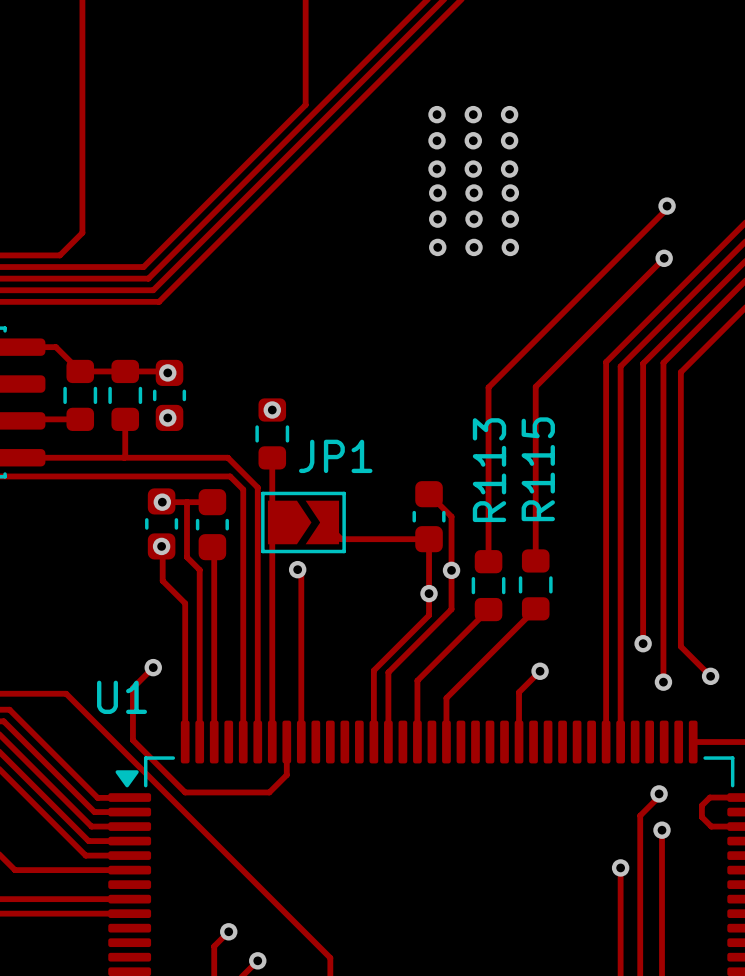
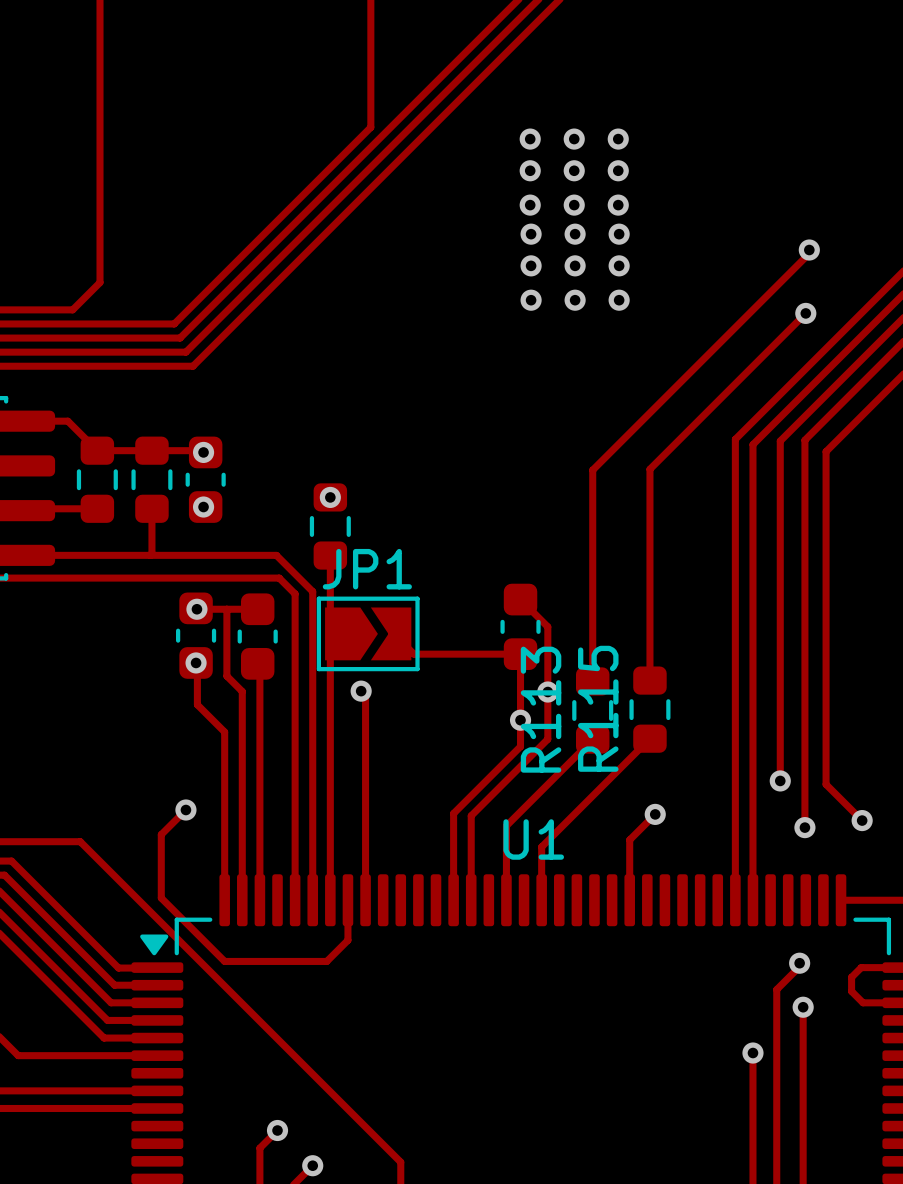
JP1 name position: JP1 (335, 456) -> JP1 (367, 569)
R115 name position: R115 (538, 469) -> R115 (598, 708)
R113 name position: R113 (489, 470) -> R113 (541, 709)
U1 name position: U1 (122, 697) -> U1 (533, 839)

